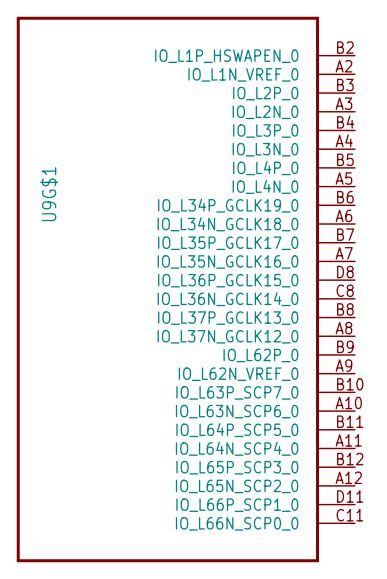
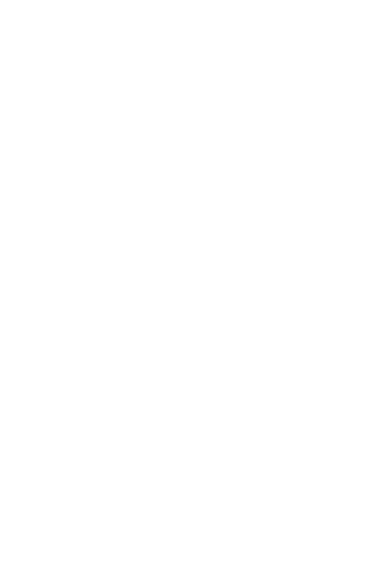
U9G$1: (185, 289) -> none

